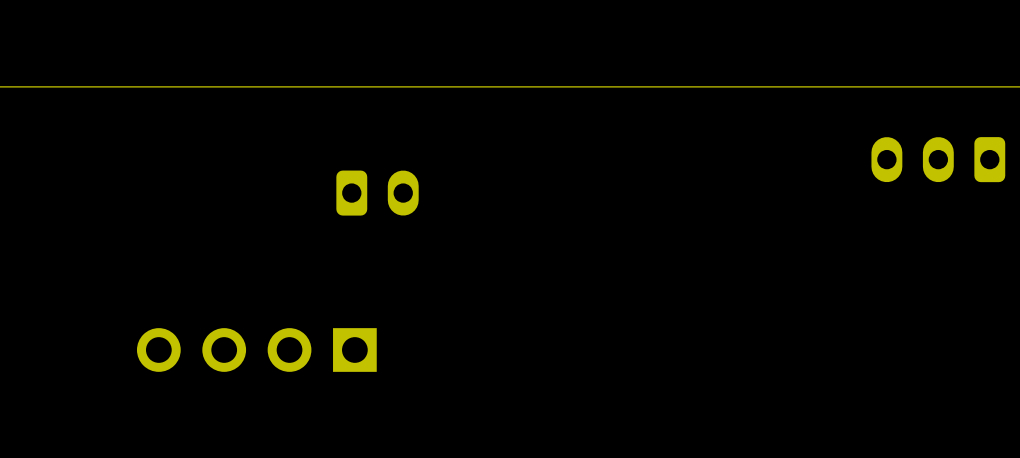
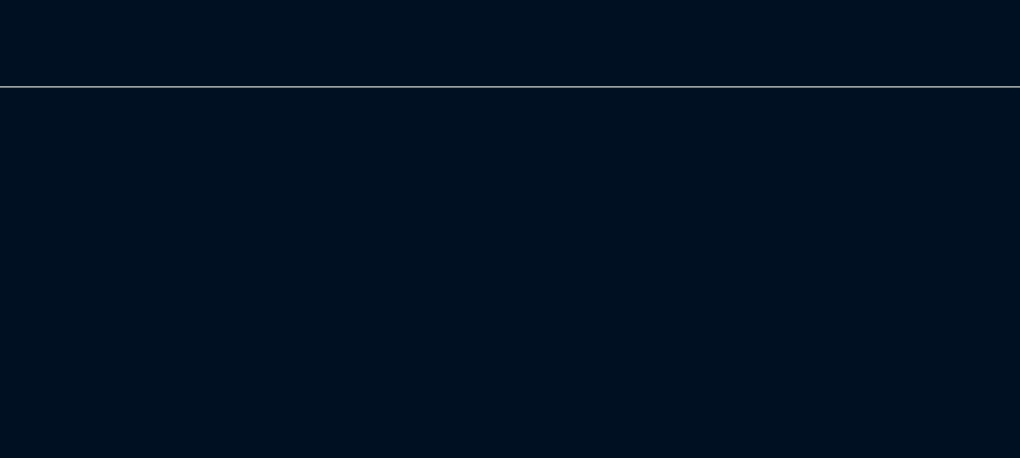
part: (938, 159) -> none
part: (377, 193) -> none
part: (256, 350) -> none

